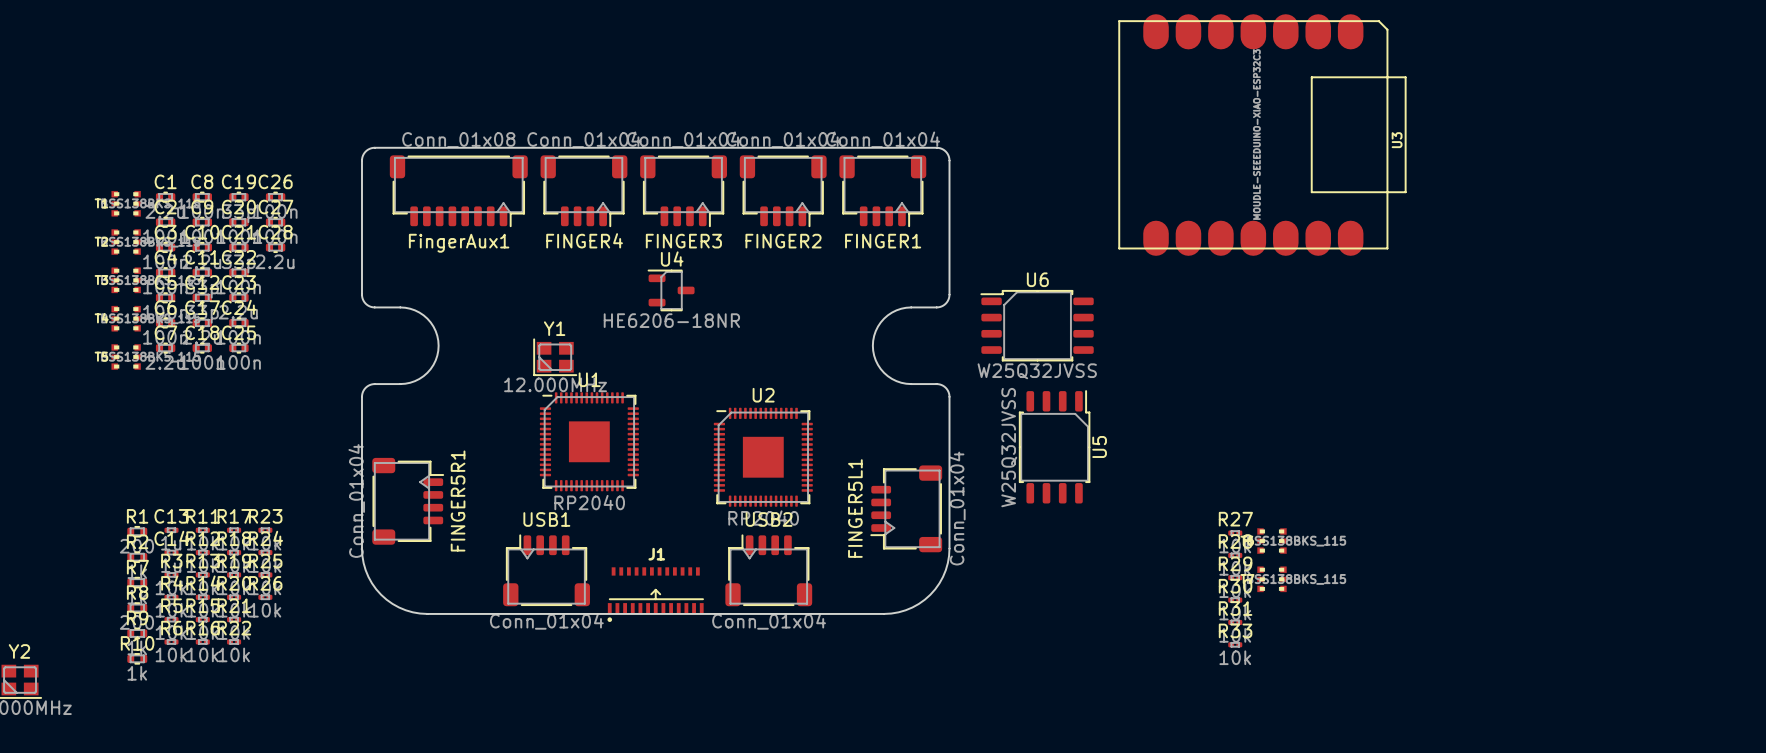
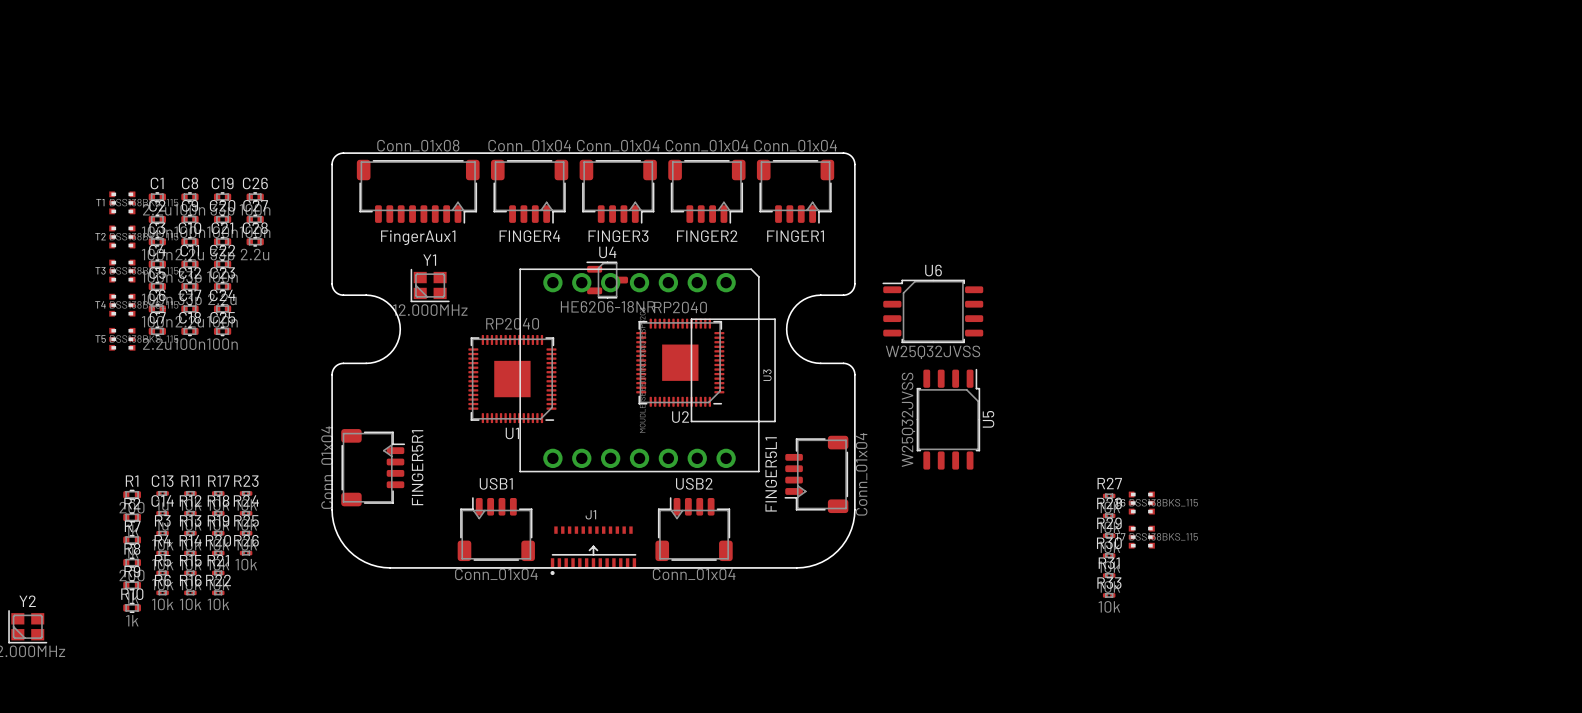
U3 footprint: [1118, 14, 1407, 256] -> [519, 268, 776, 473]
Y1 position: (555, 357) -> (430, 285)
U1 rotation: 0° (589, 441) -> 180° (512, 379)
U2 rotation: 0° (763, 457) -> 180° (680, 362)
U2 position: (763, 457) -> (680, 362)

